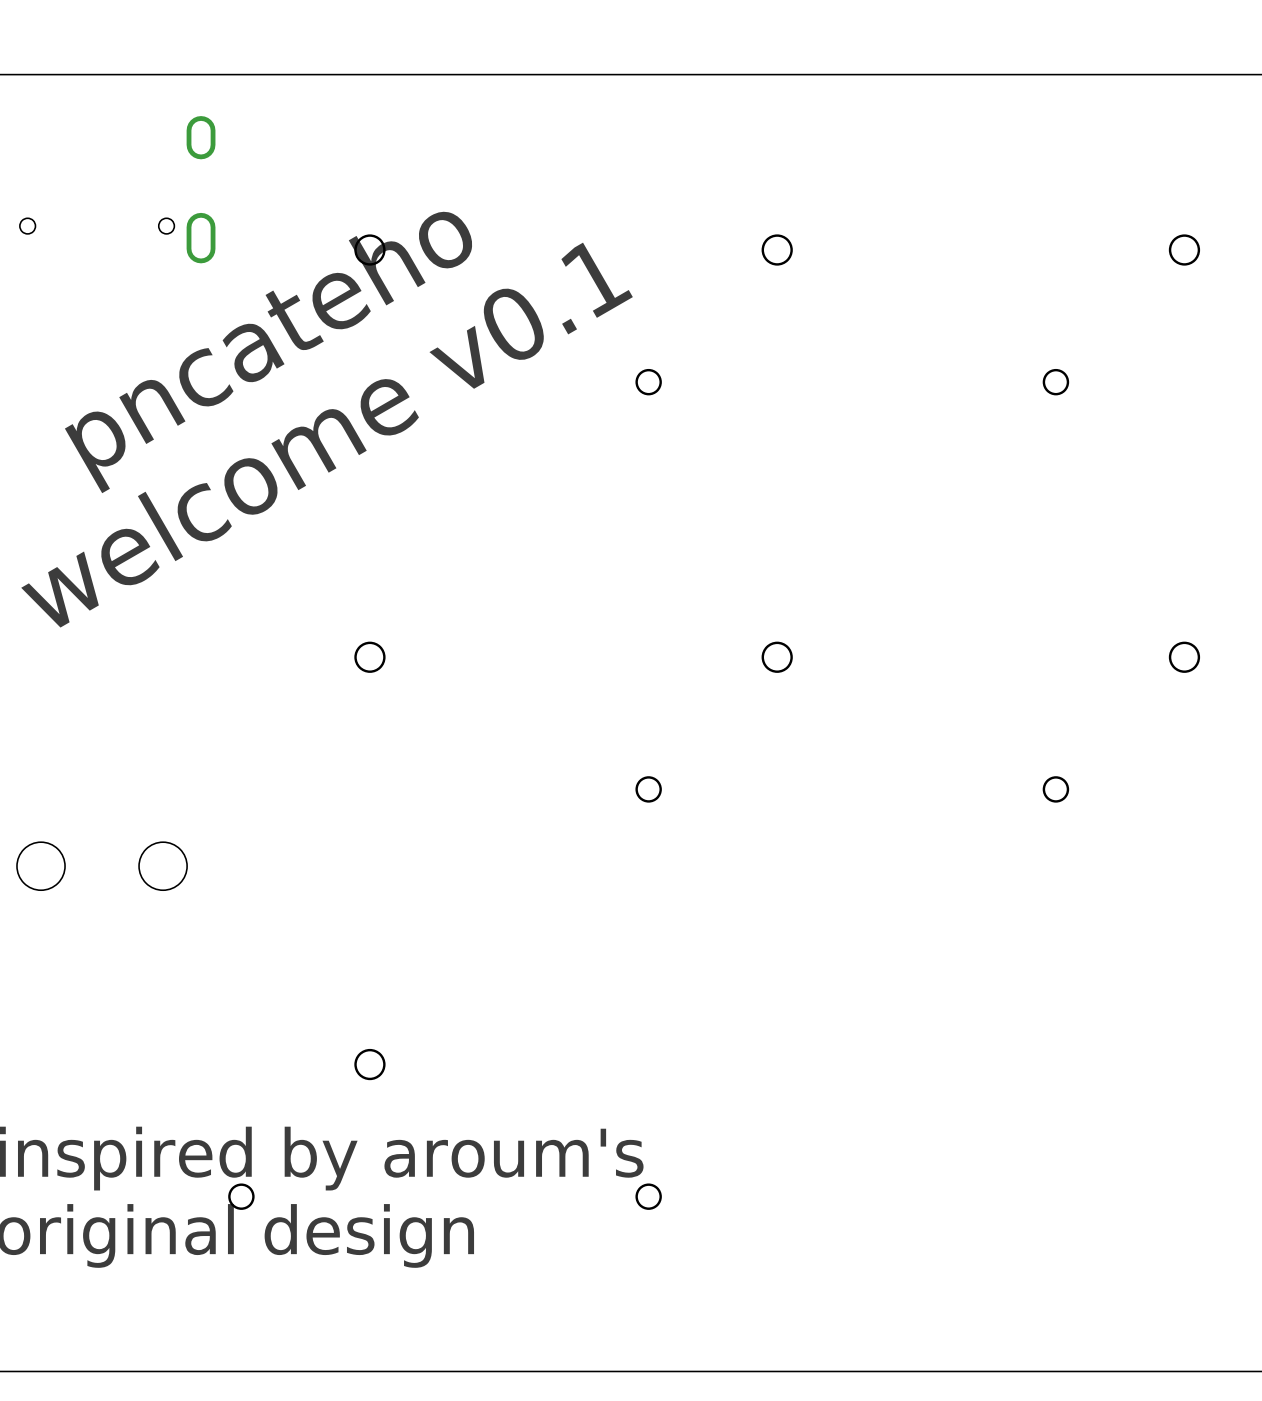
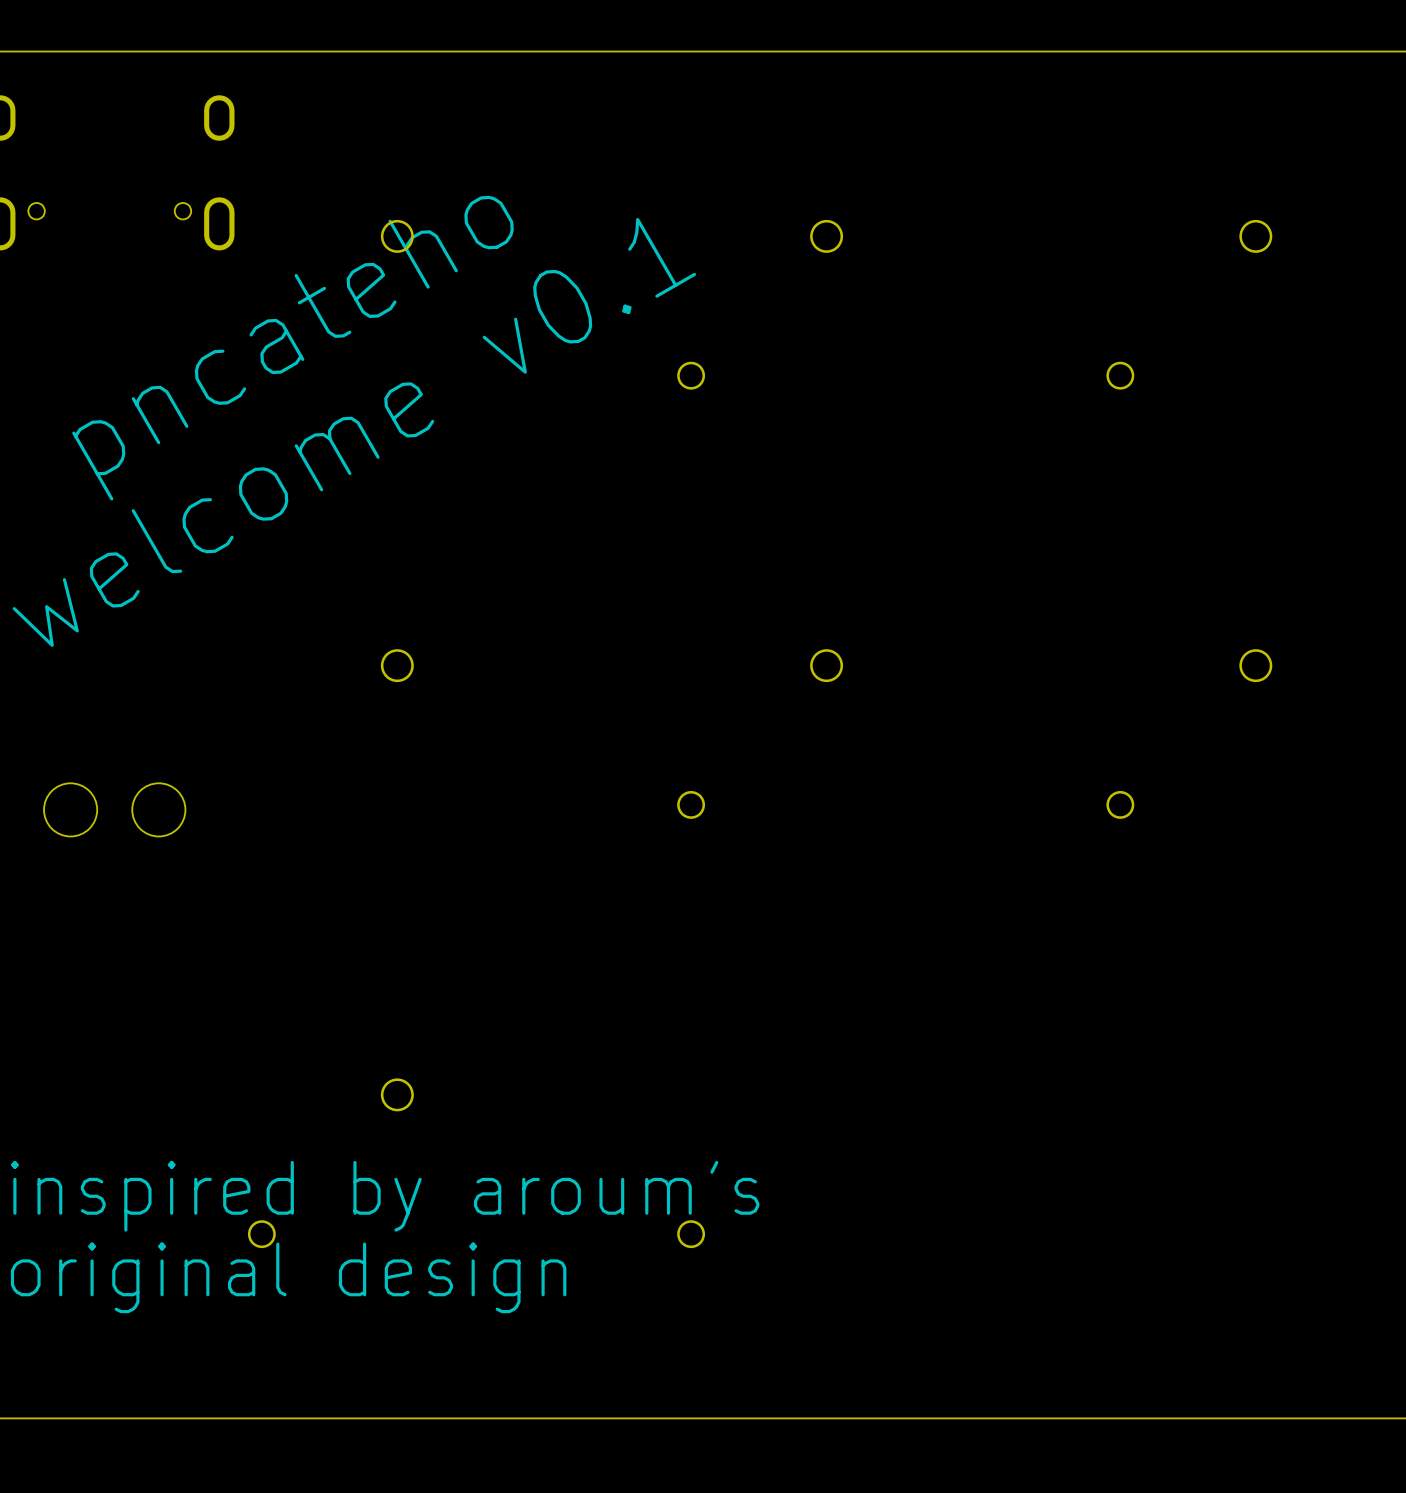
round board edge: none -> [43, 782, 98, 838]
round board edge: none -> [131, 782, 187, 838]
round board edge: [16, 841, 66, 891] -> none
round board edge: [138, 841, 188, 891] -> none

